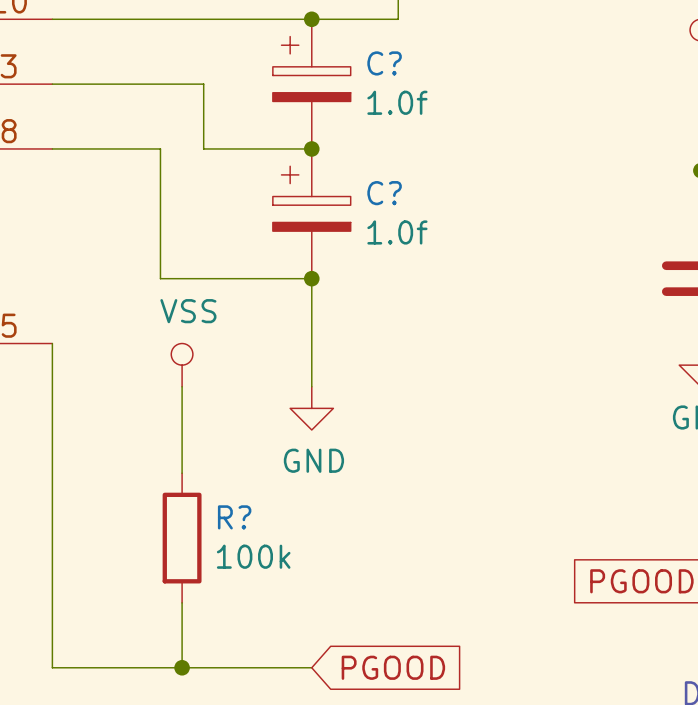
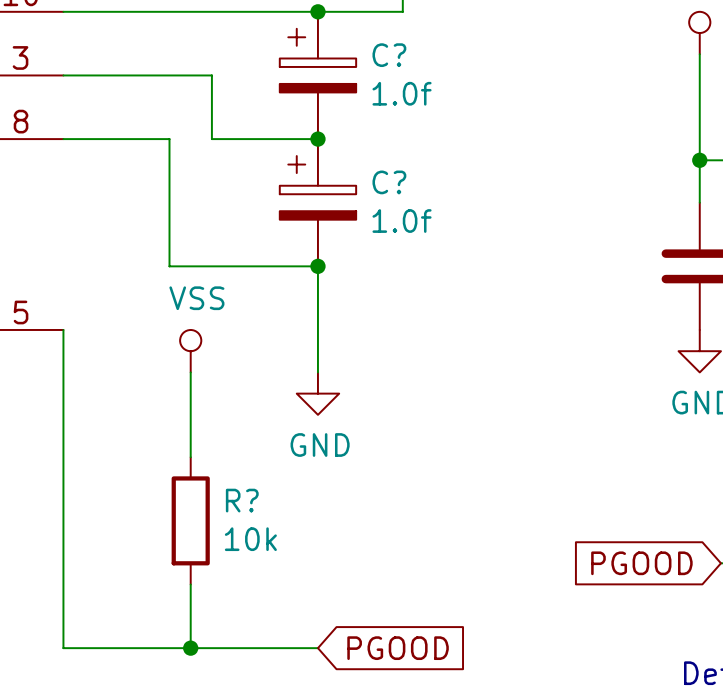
R? value: 100k (253, 556) -> 10k (250, 539)

